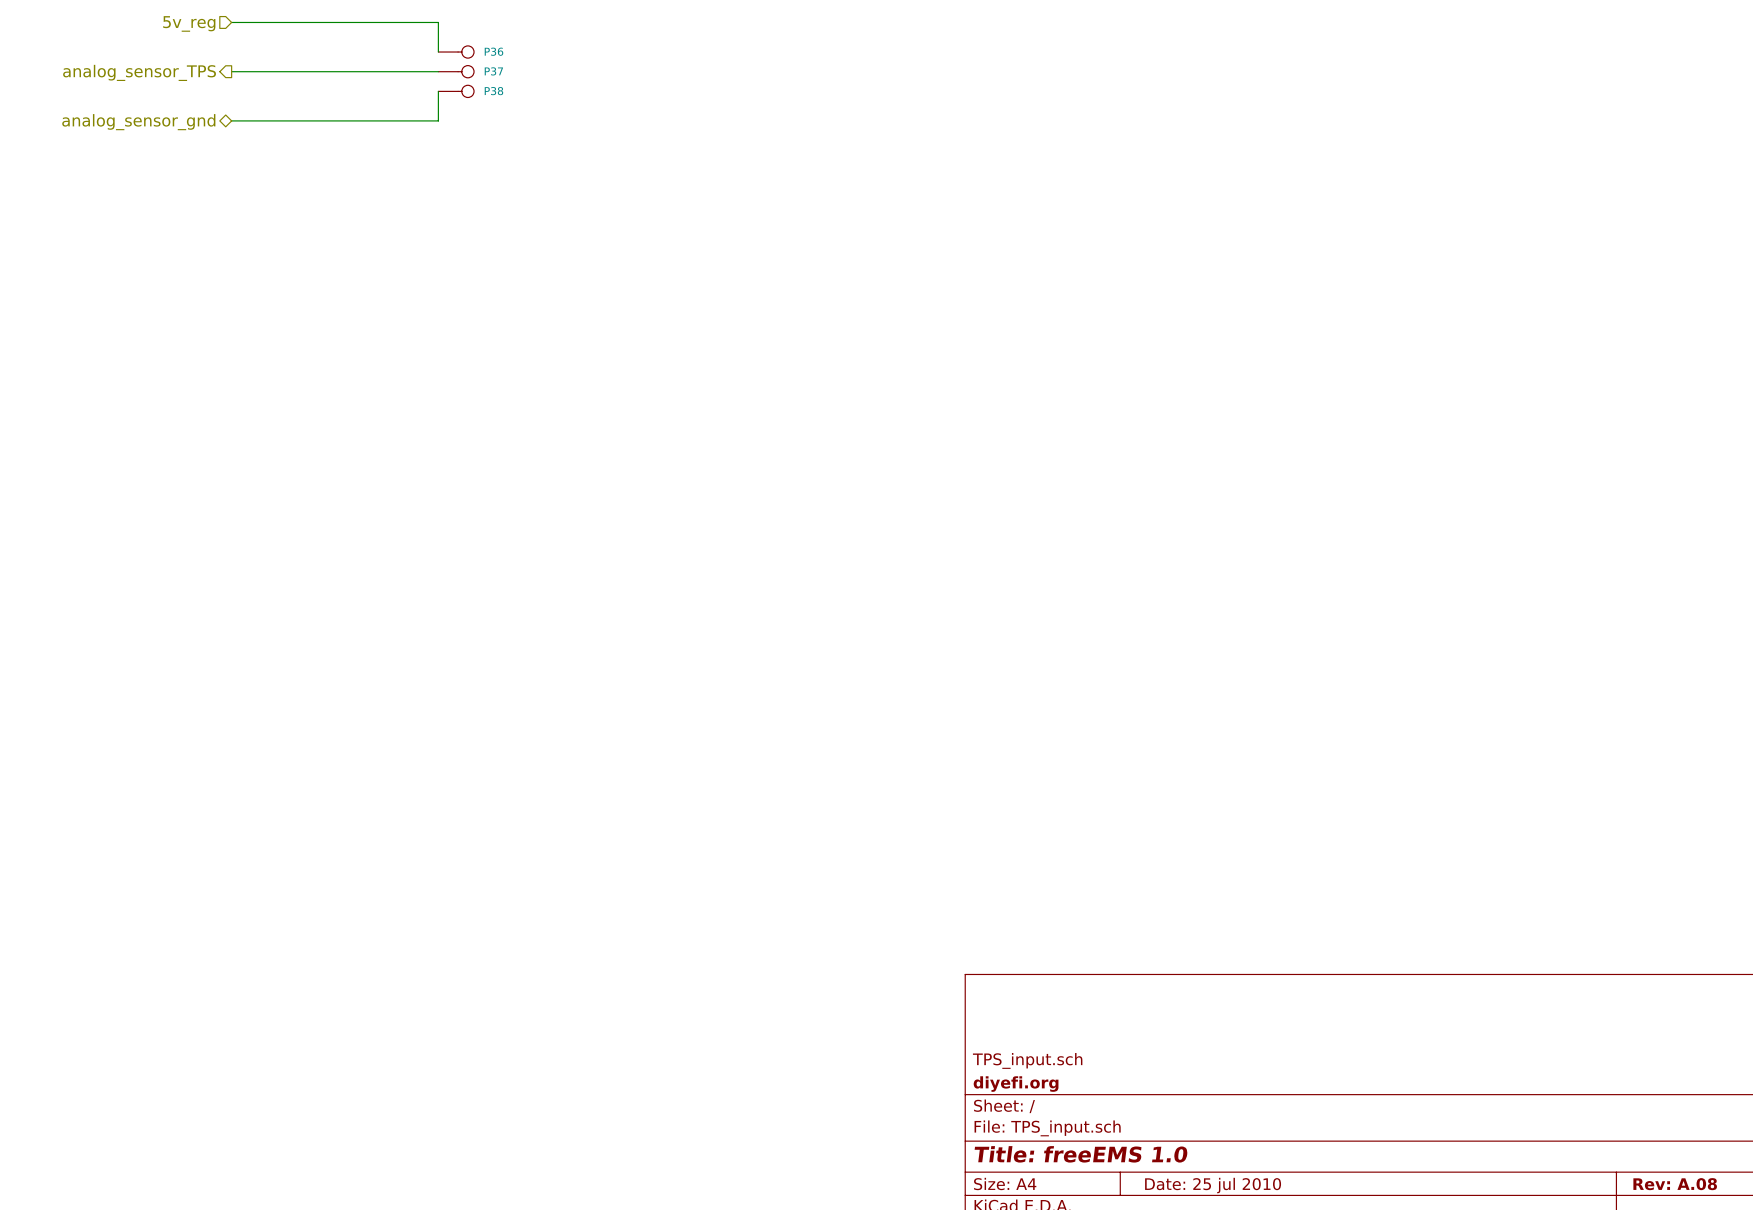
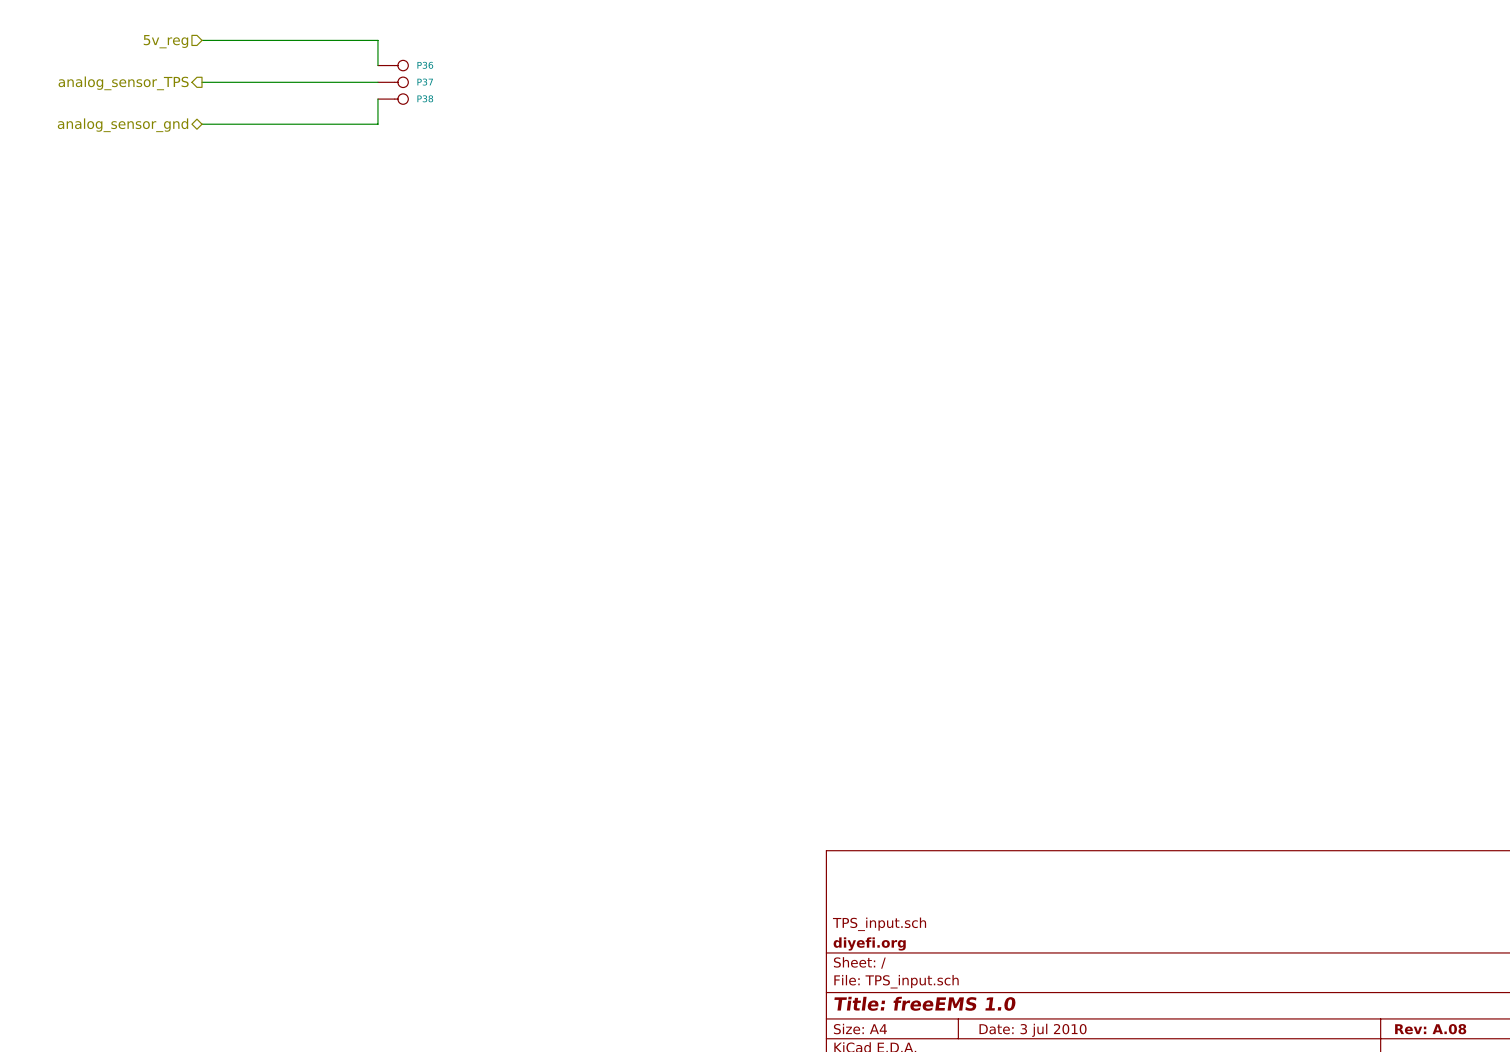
title block: Date: 25 jul 2010 (1213, 1185) -> Date: 3 jul 2010 (1033, 1030)

